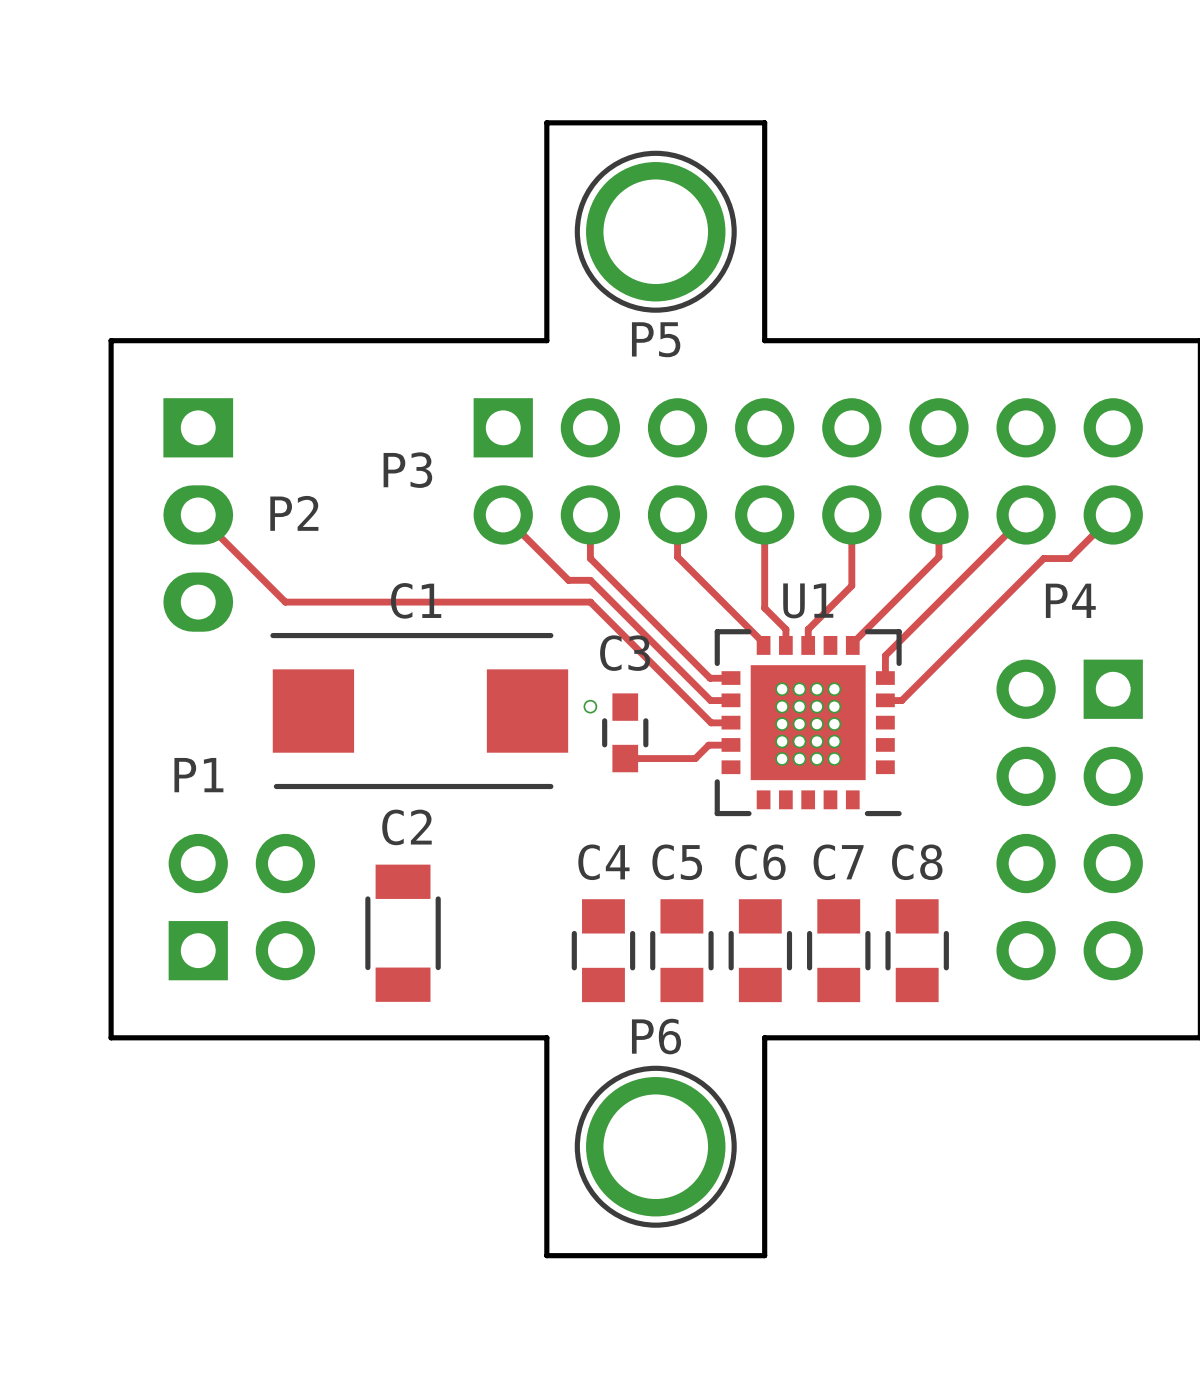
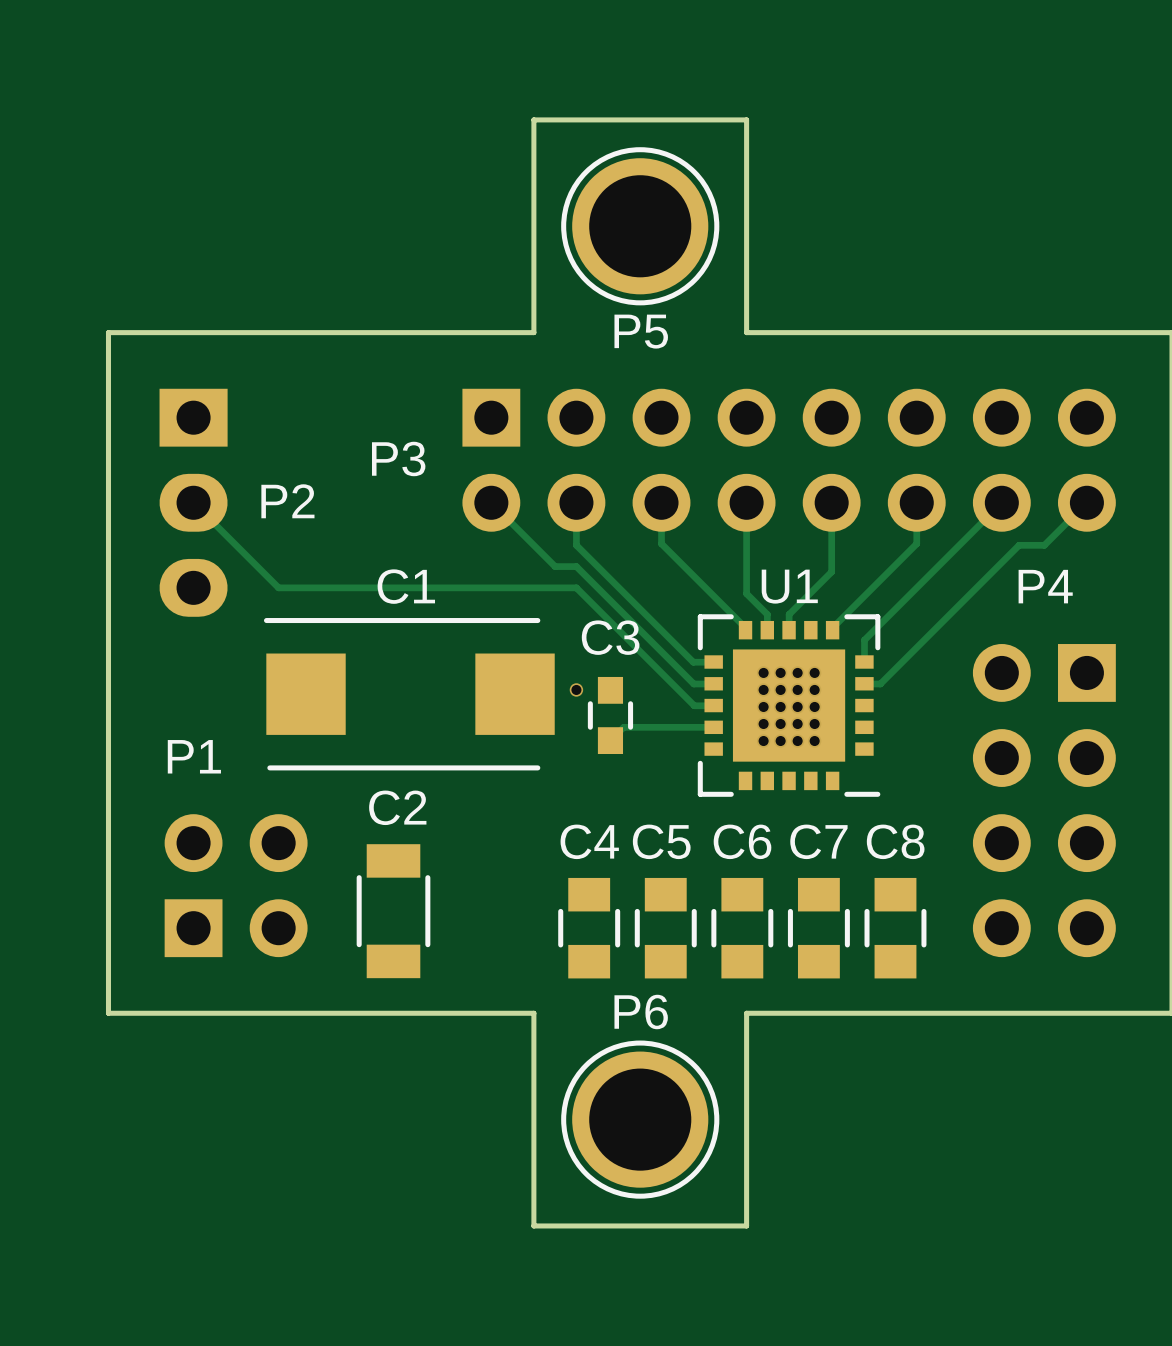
track: (731, 745) (708, 745) (695, 758) (625, 758) -> (713, 727) (623, 727) (610, 740)

